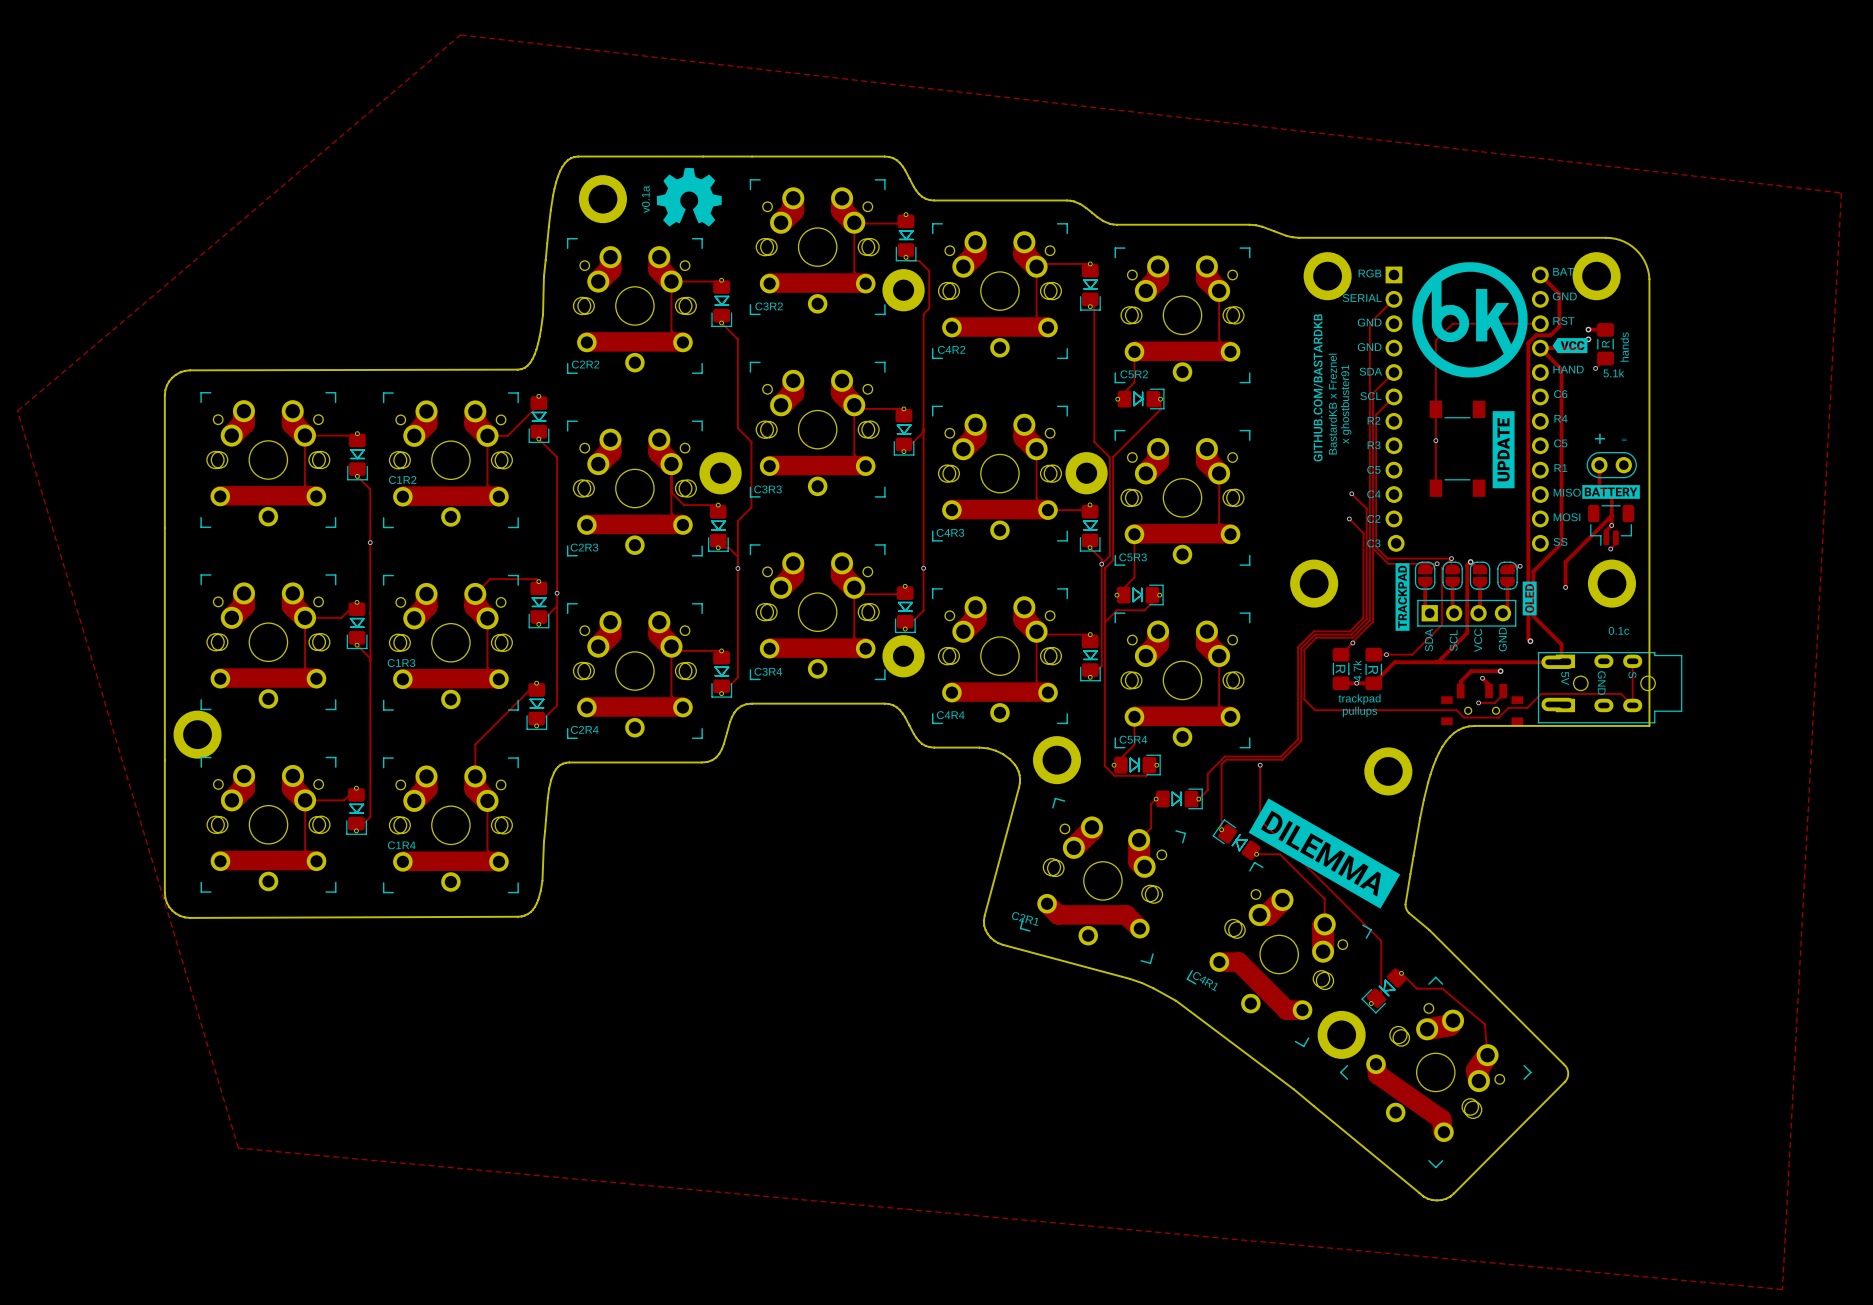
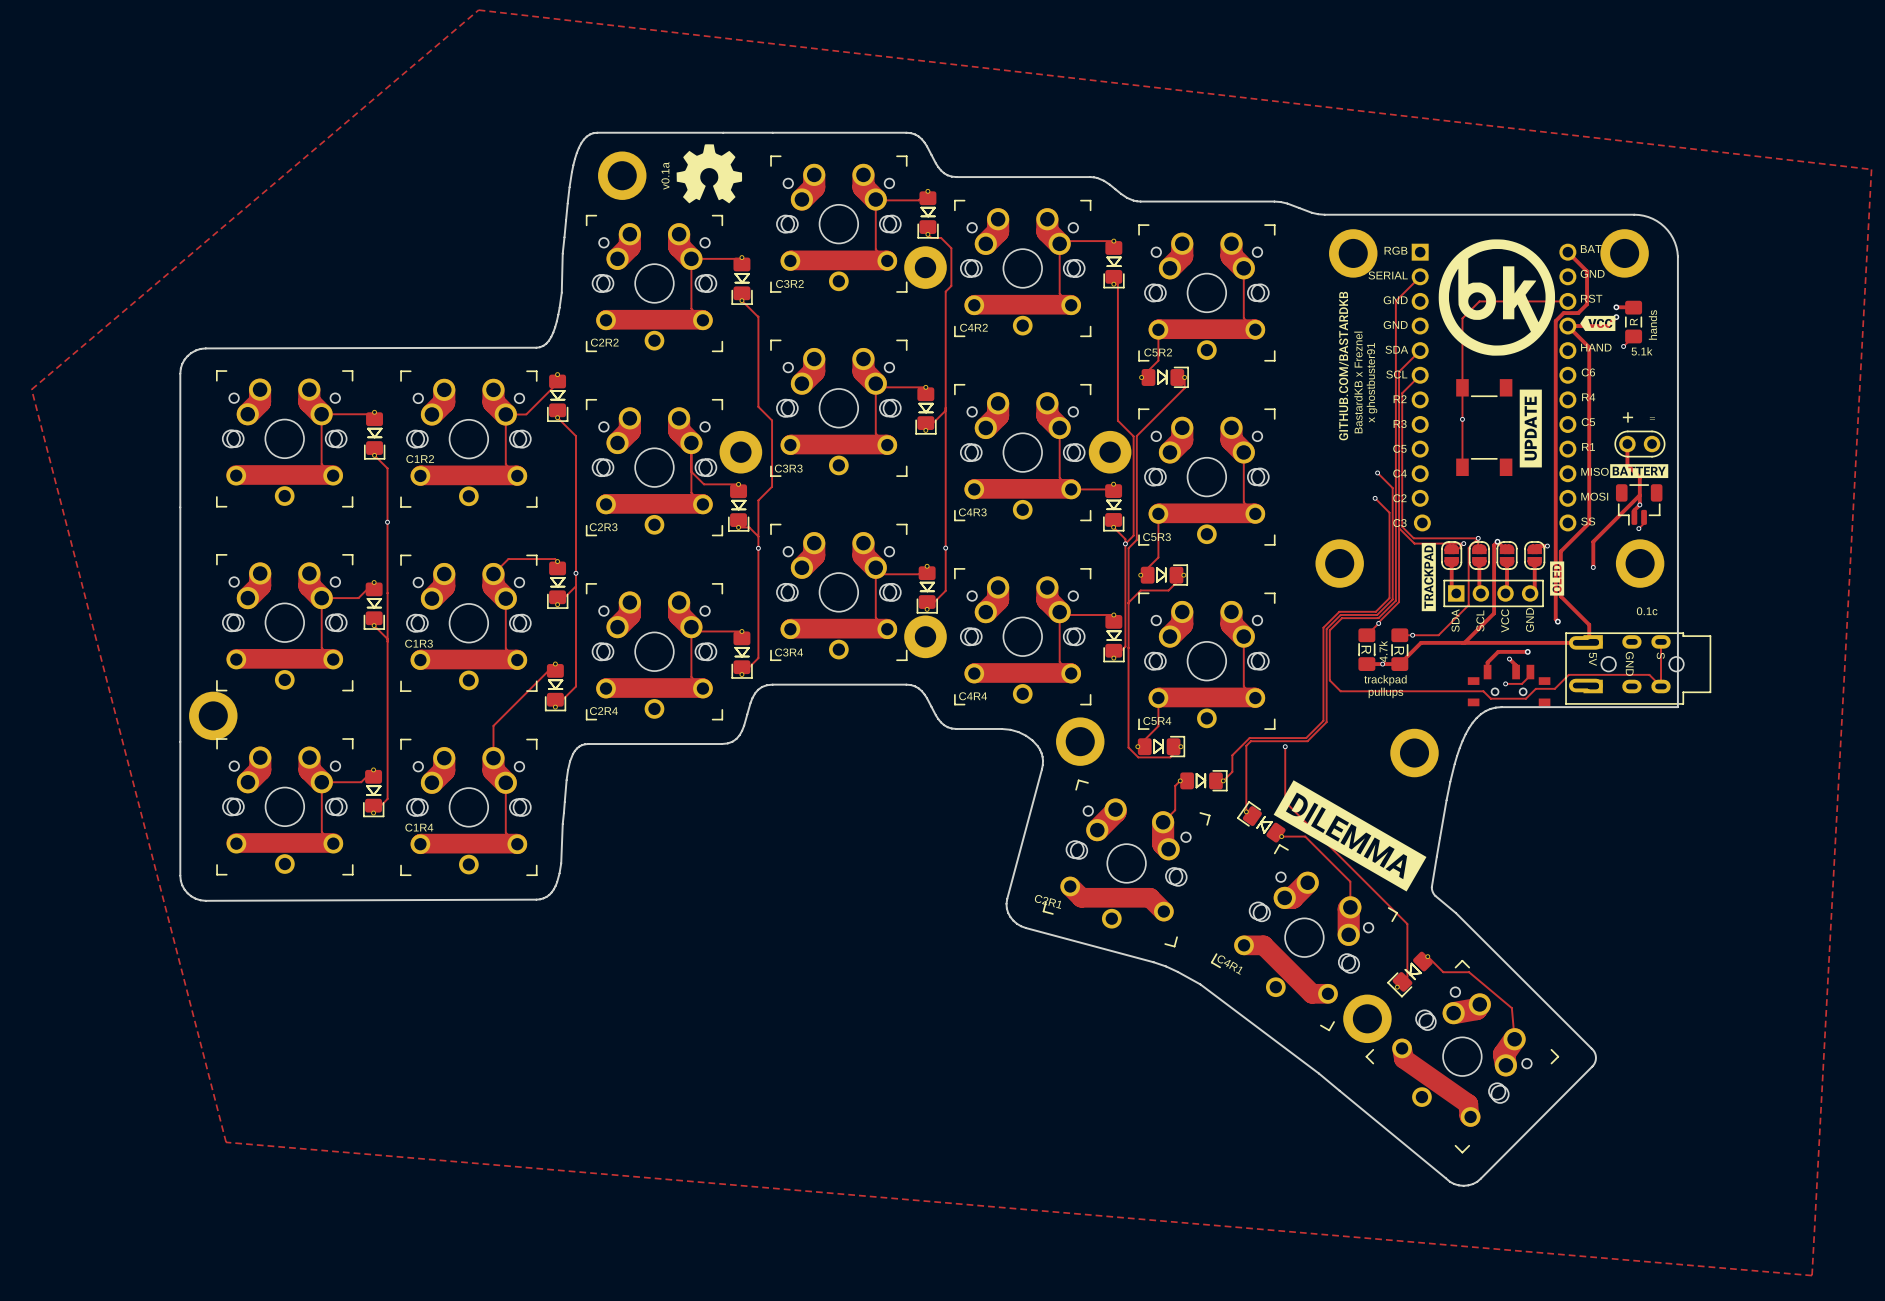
zone outline: (17, 411) (238, 1148) (1782, 1289) -> (31, 389) (226, 1142) (1812, 1275)

